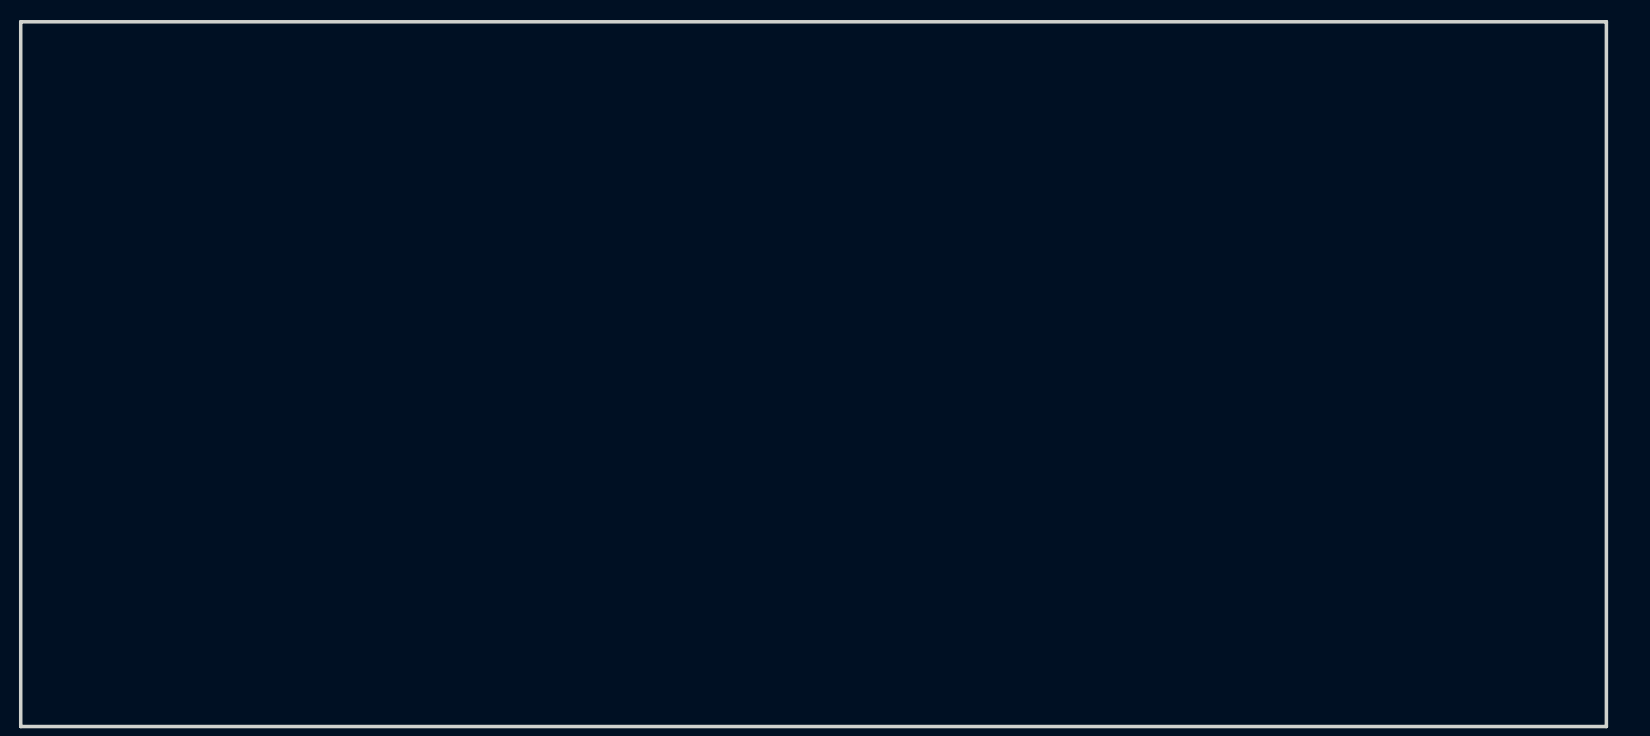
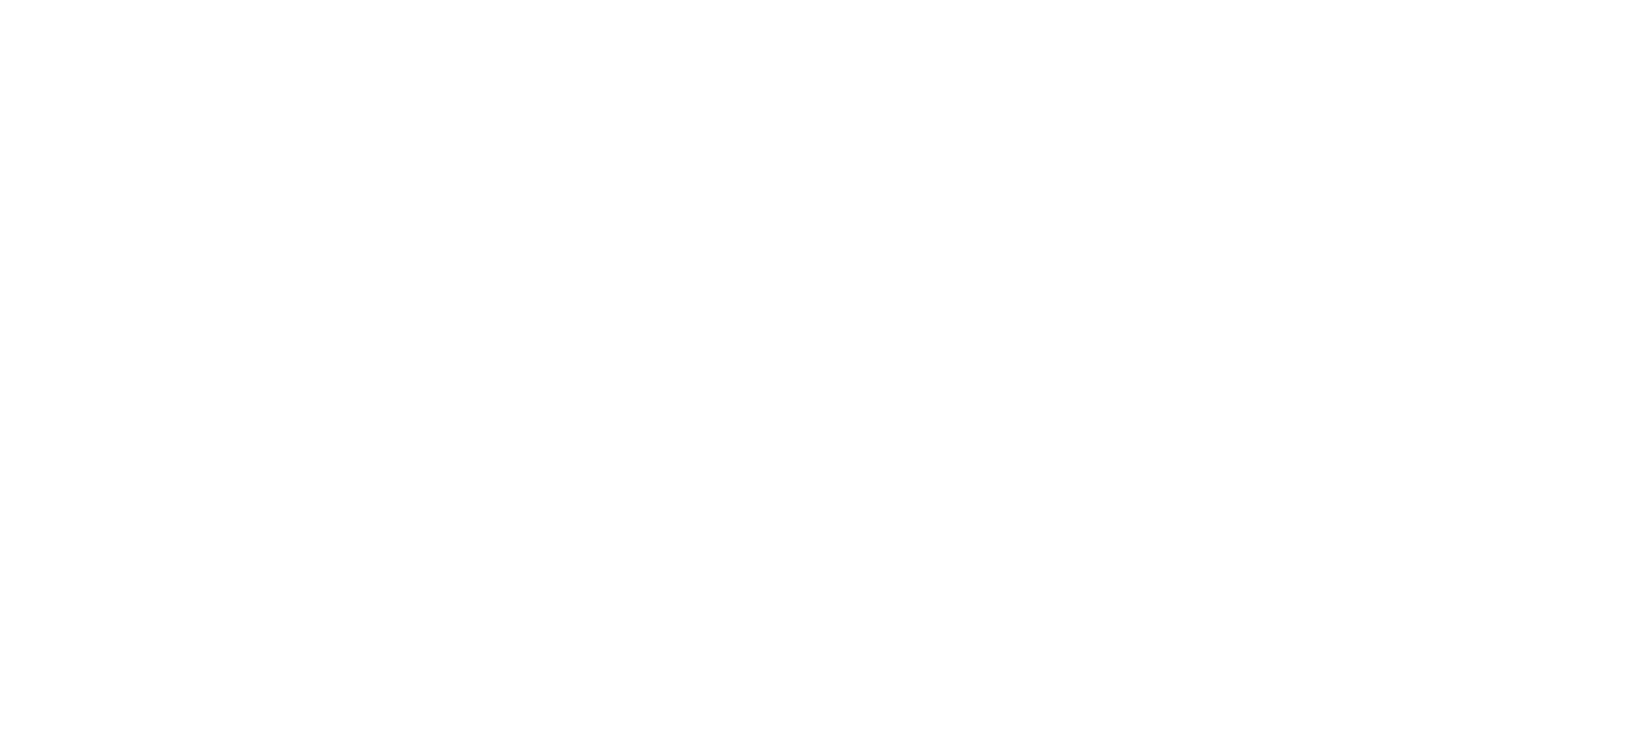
board edge: (1606, 21) (20, 21) (20, 726) (1606, 726) (1606, 21) -> none

